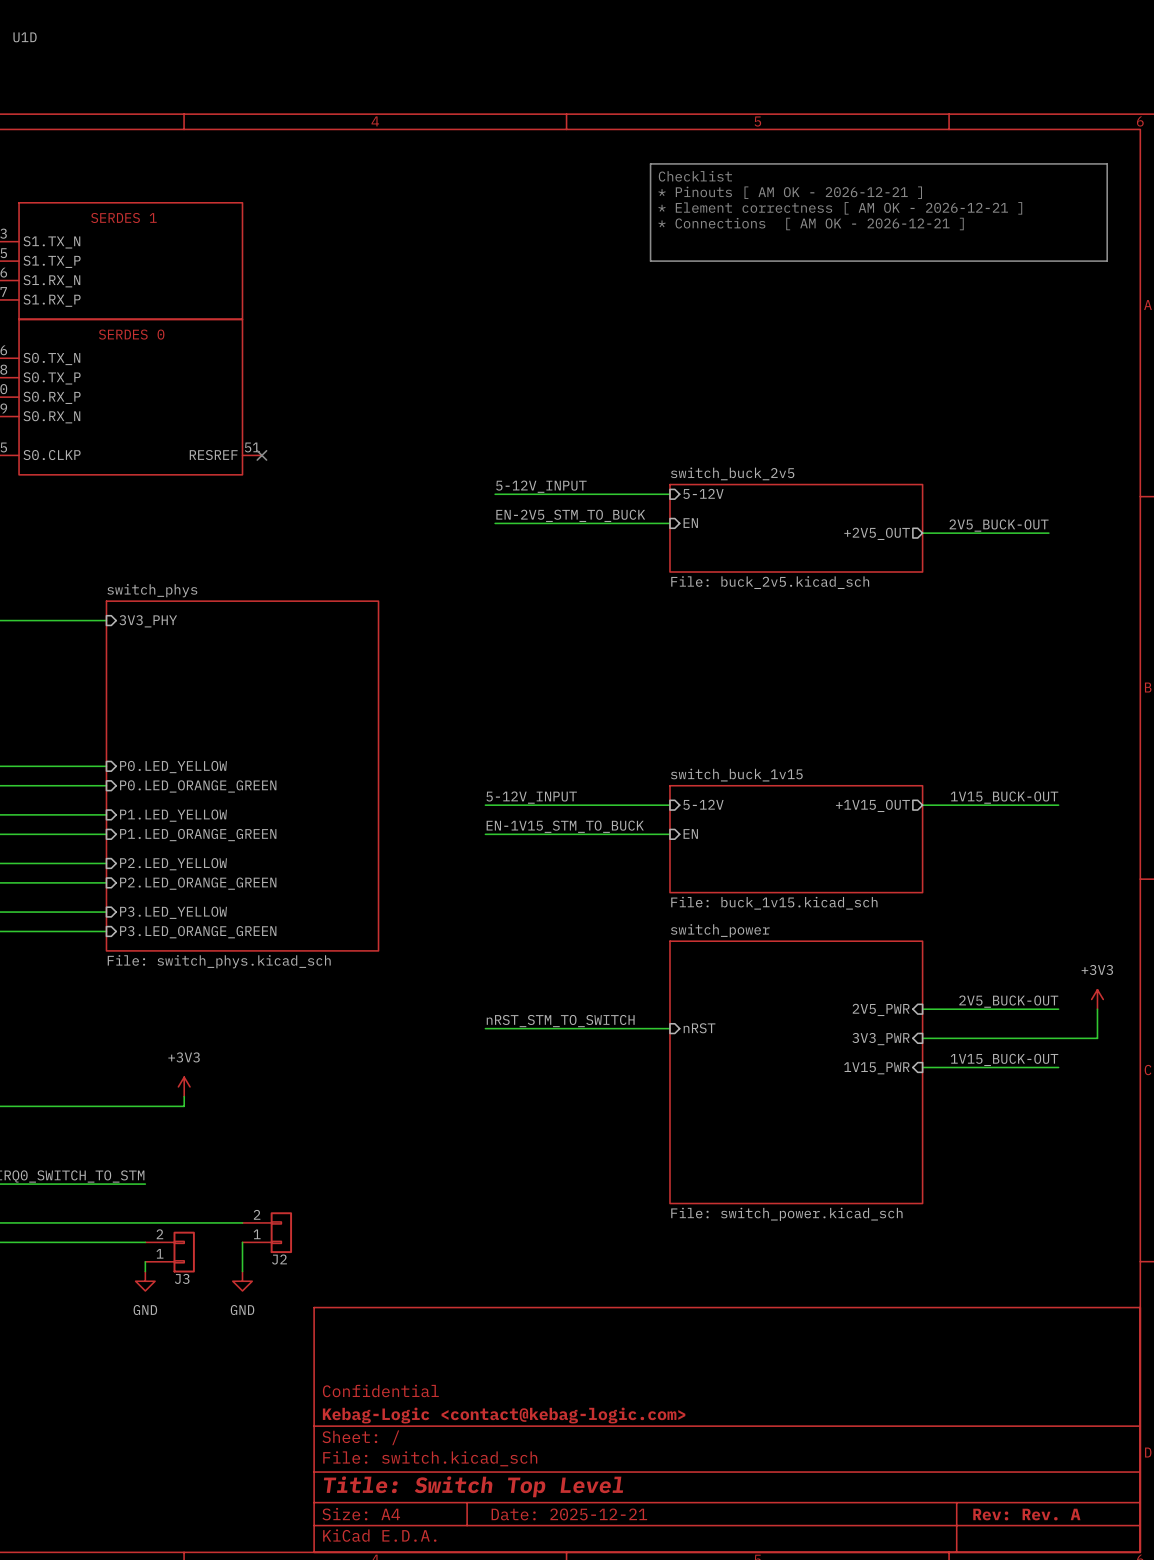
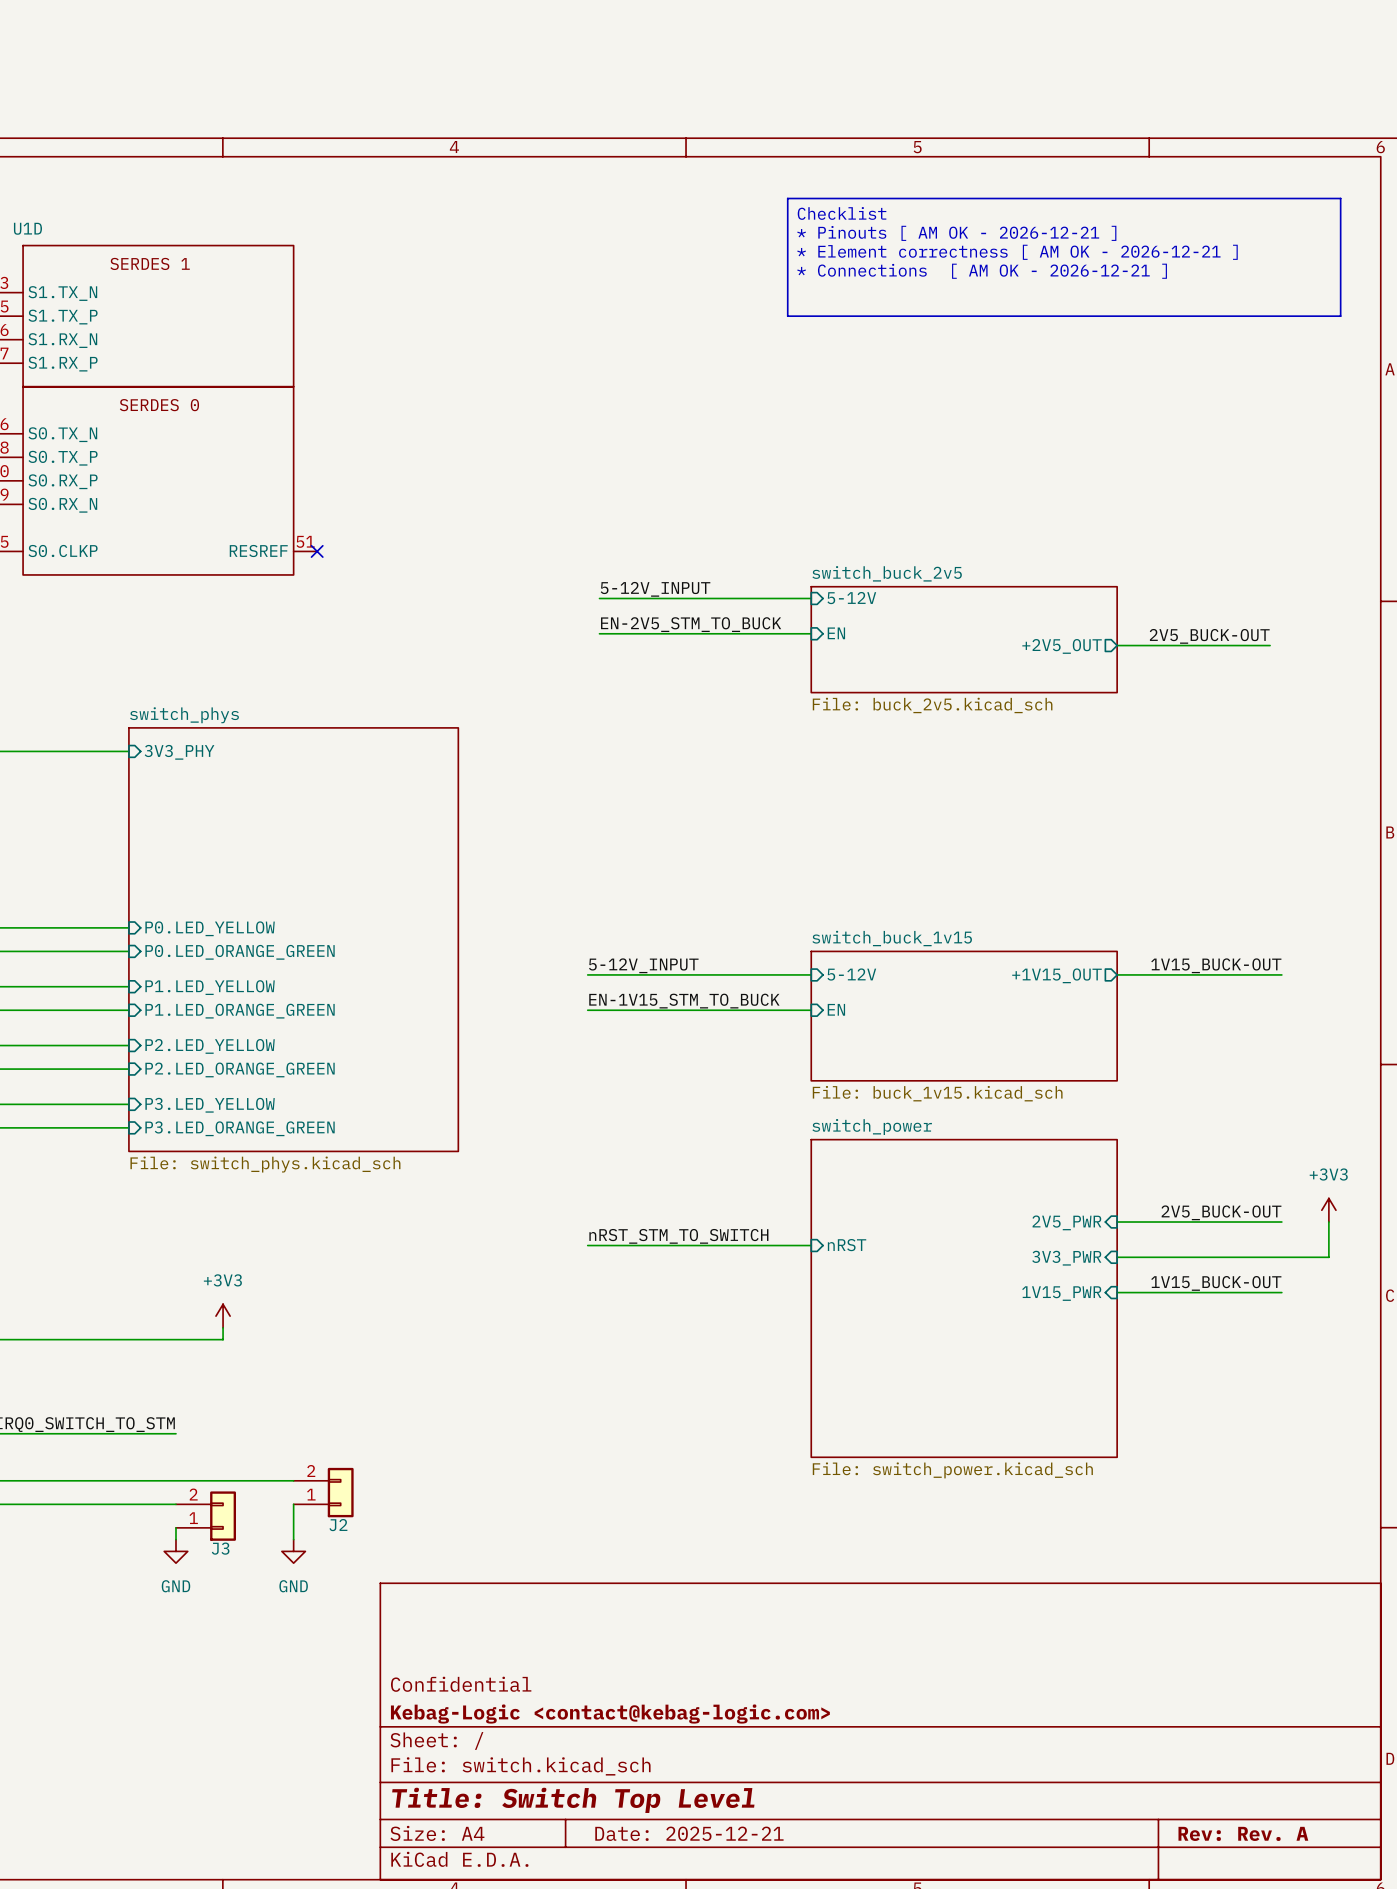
U1D name position: U1D (25, 37) -> U1D (27, 228)

